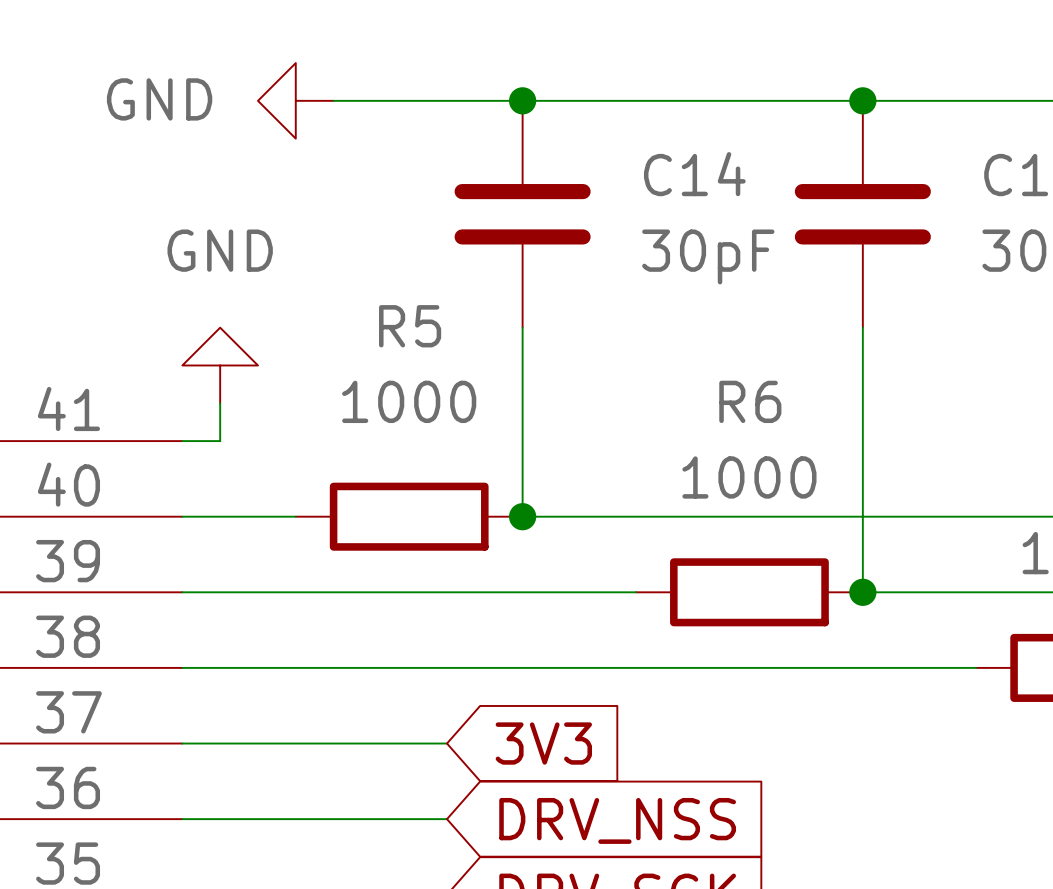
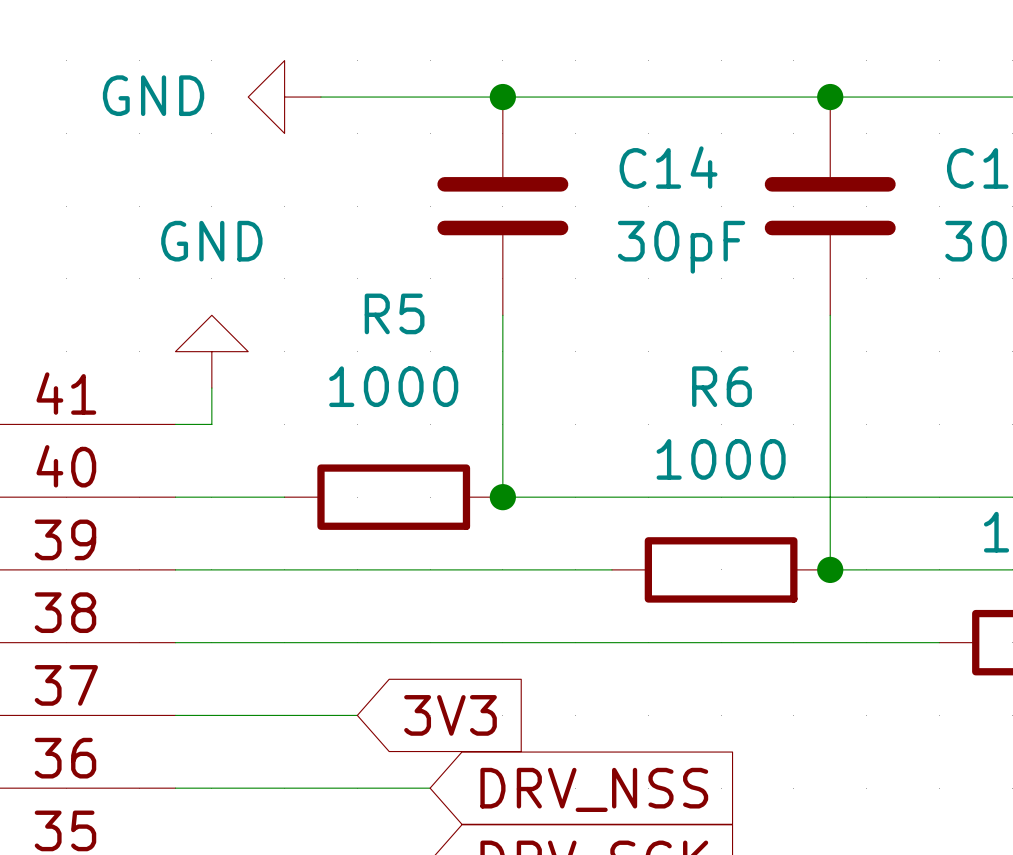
wire: (371, 743) (447, 743) -> none
global label position: 3V3 (543, 743) -> 3V3 (450, 715)

